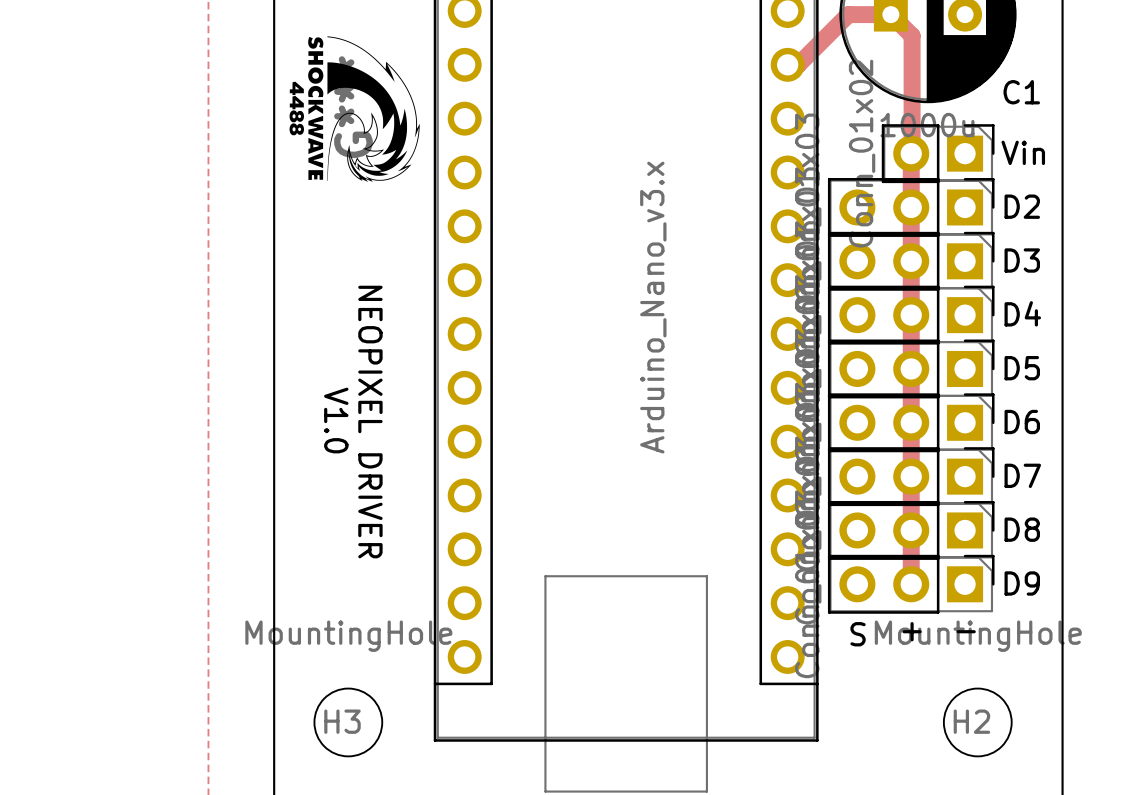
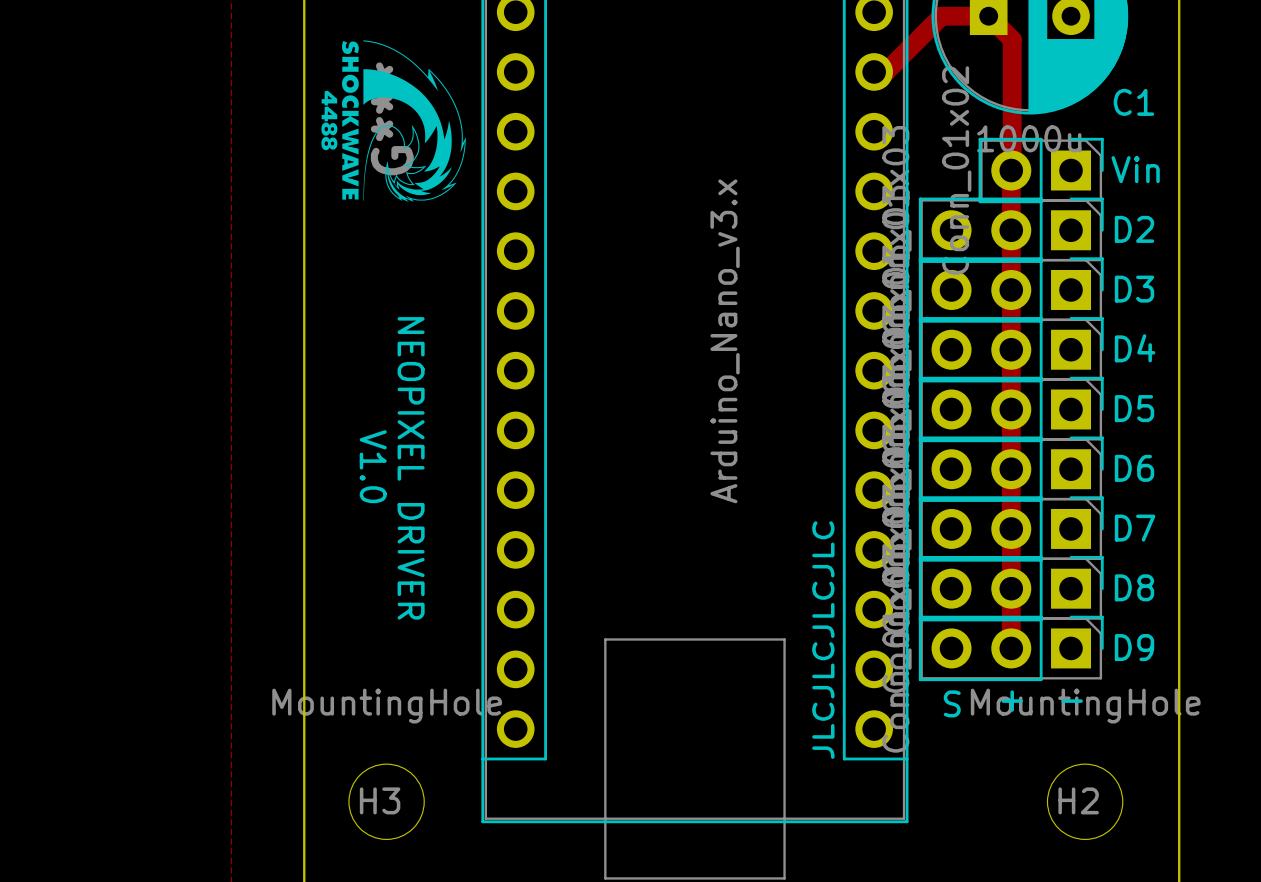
text: none -> JLCJLCJLCJLC (823, 640)

